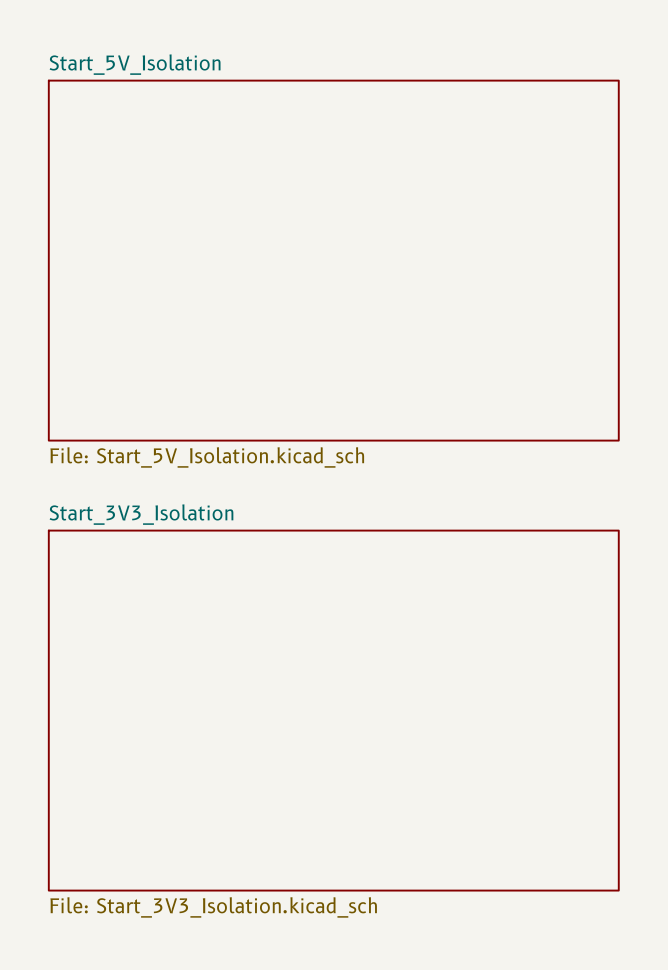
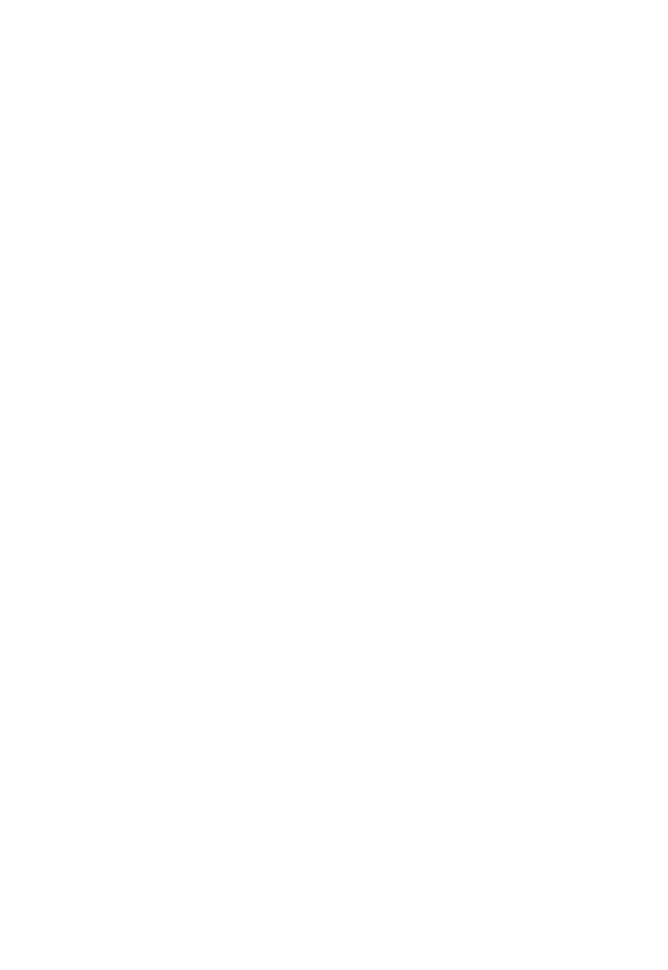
sheet Start_5V_Isolation: File: Start_5V_Isolation.kicad_sch (333, 260) -> none
sheet Start_3V3_Isolation: File: Start_3V3_Isolation.kicad_sch (333, 710) -> none

